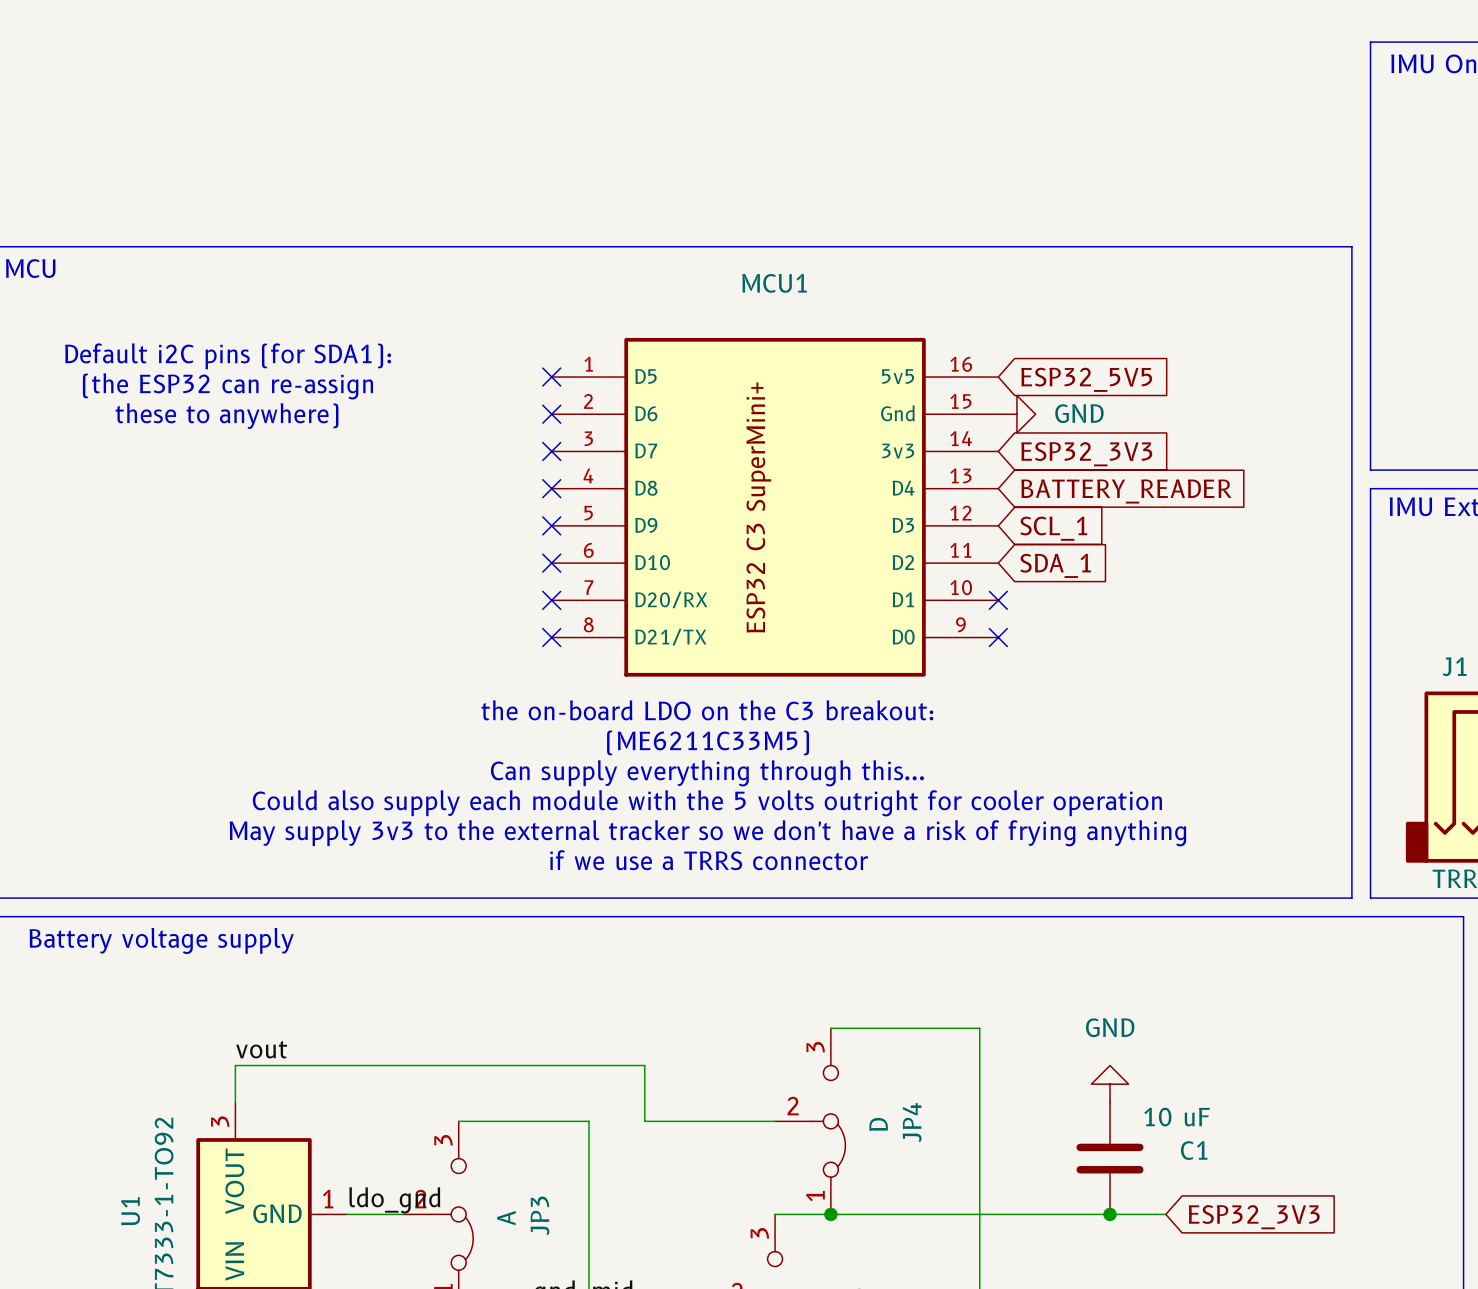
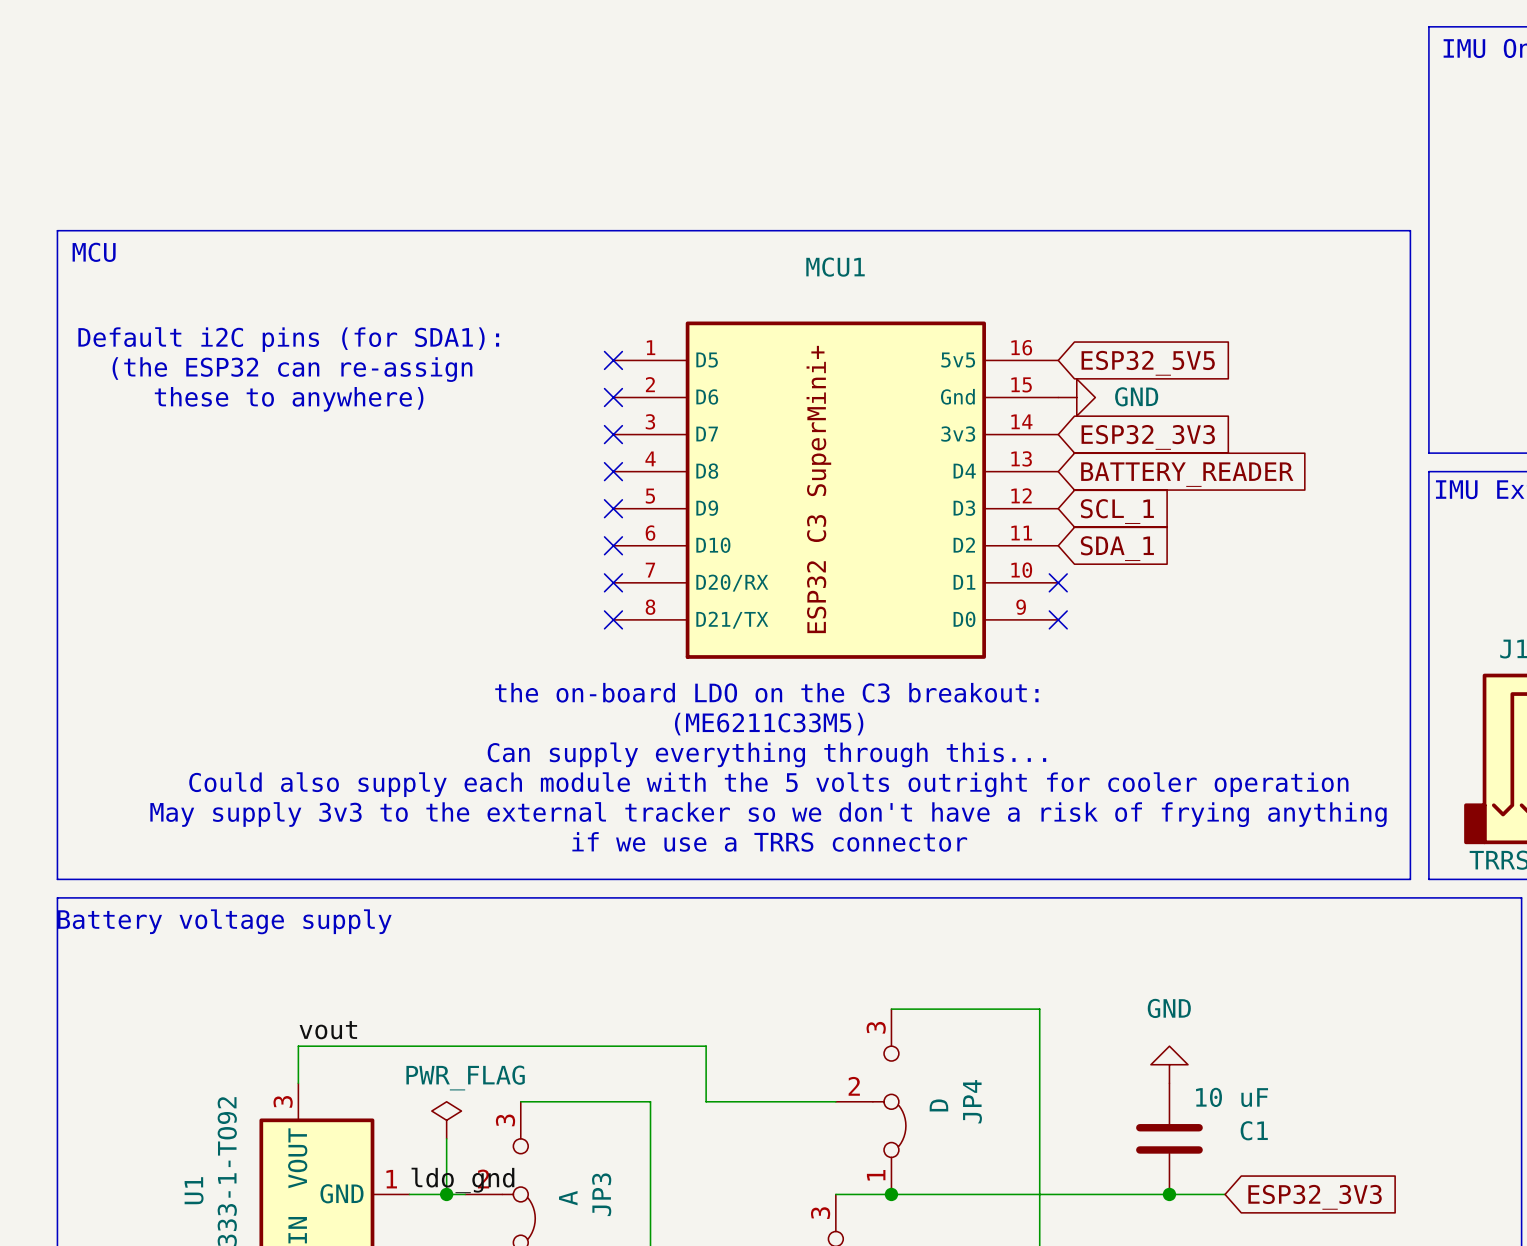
power symbol: none -> PWR_FLAG (446, 1120)
wire: none -> (446, 1138) (446, 1194)
junction: none -> (446, 1194)

